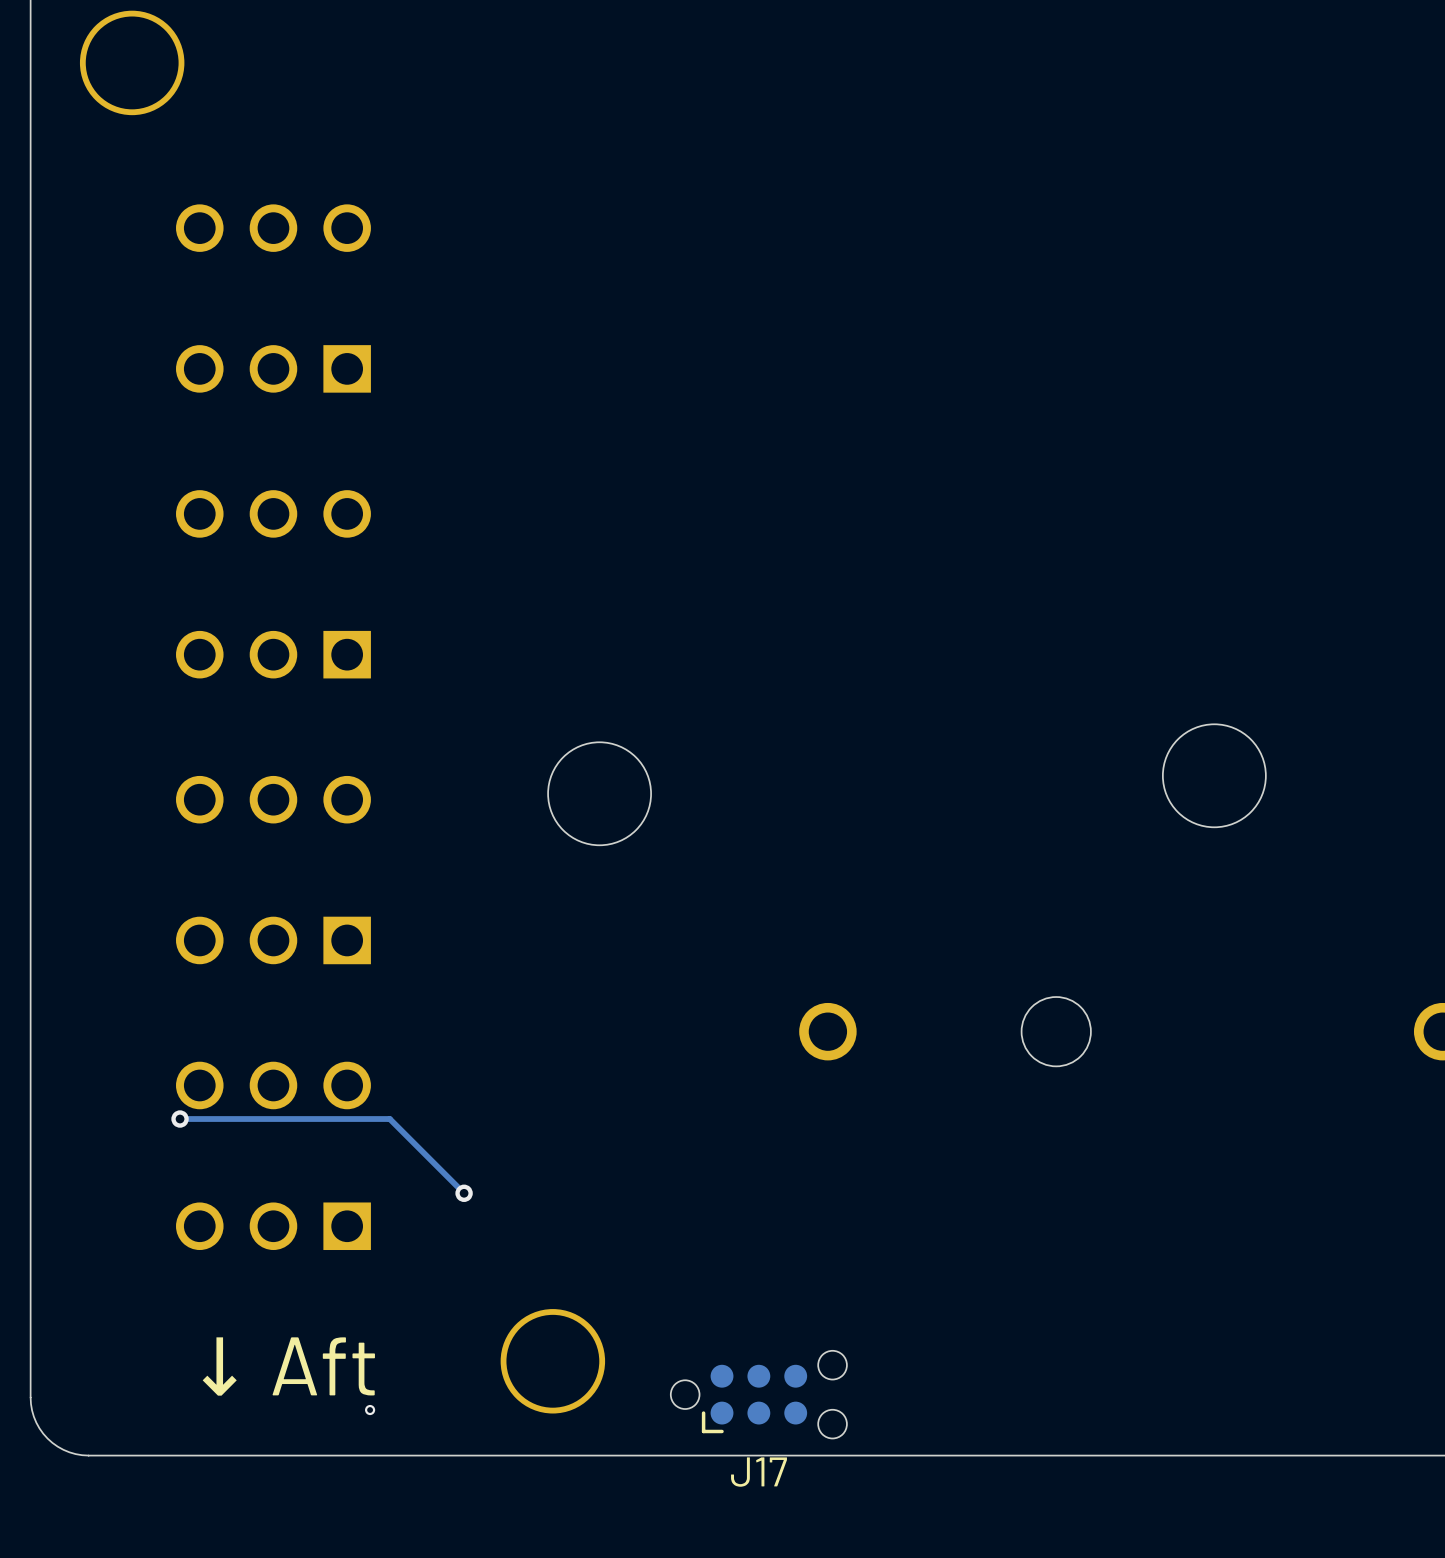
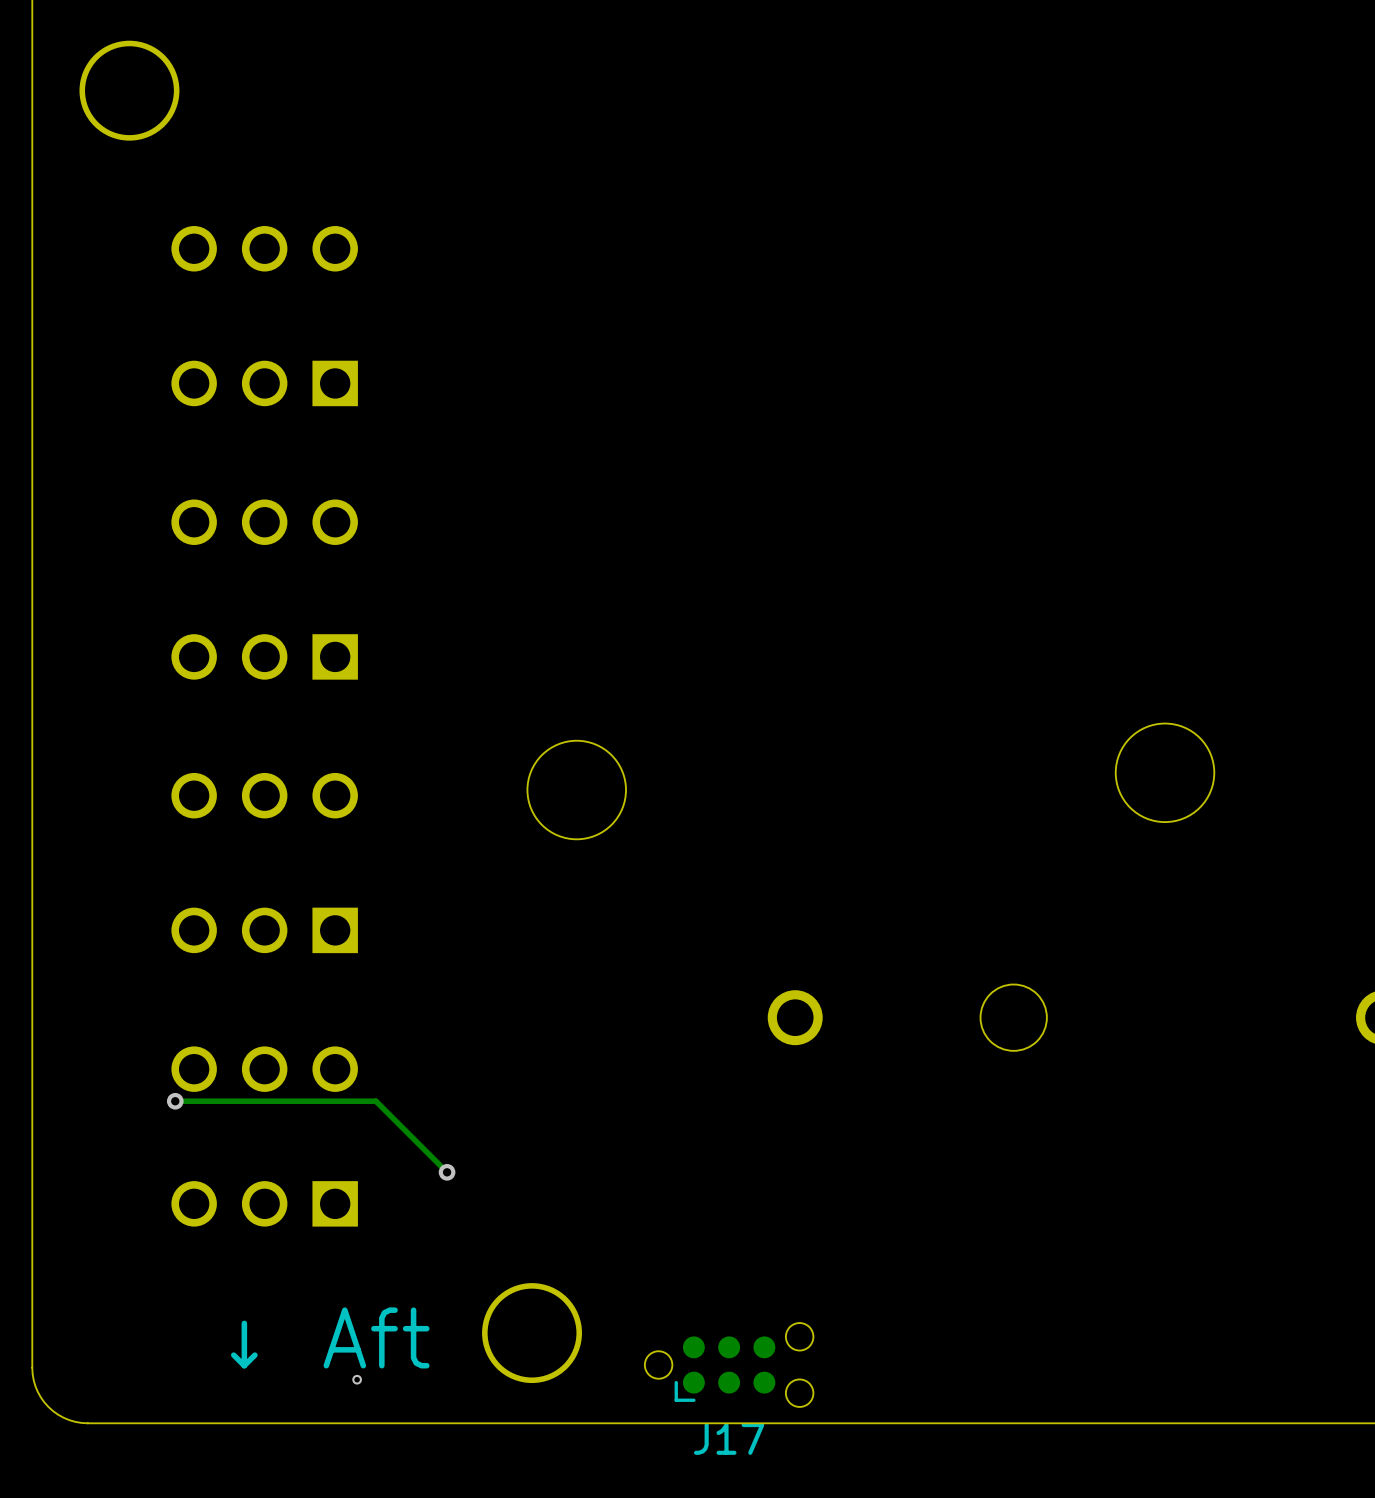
part text position: ↓ Aft (288, 1366) -> ↓ Aft (330, 1337)

